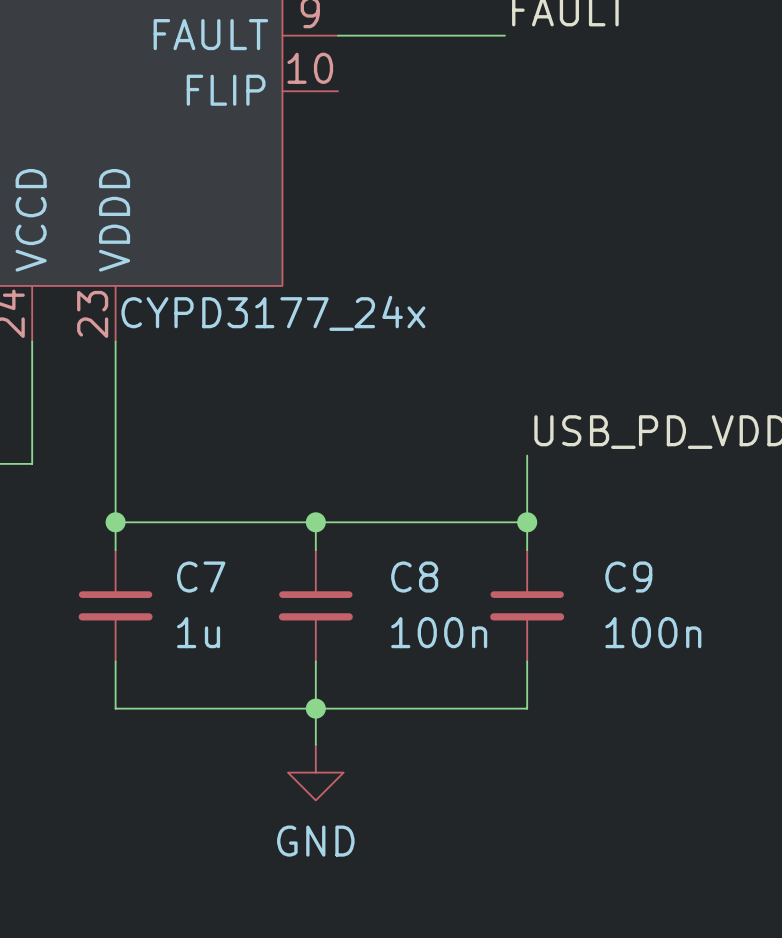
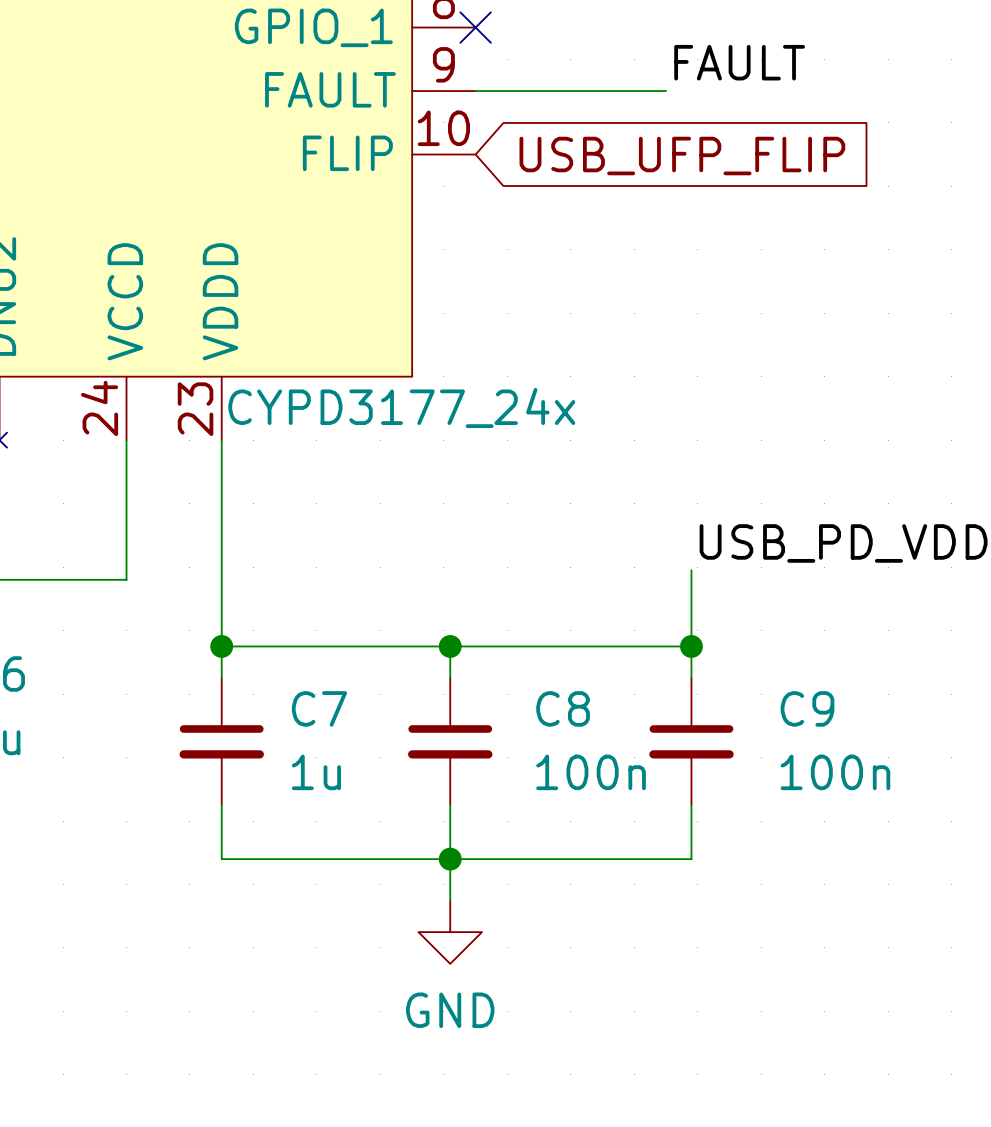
global label: none -> USB_UFP_FLIP (682, 156)

